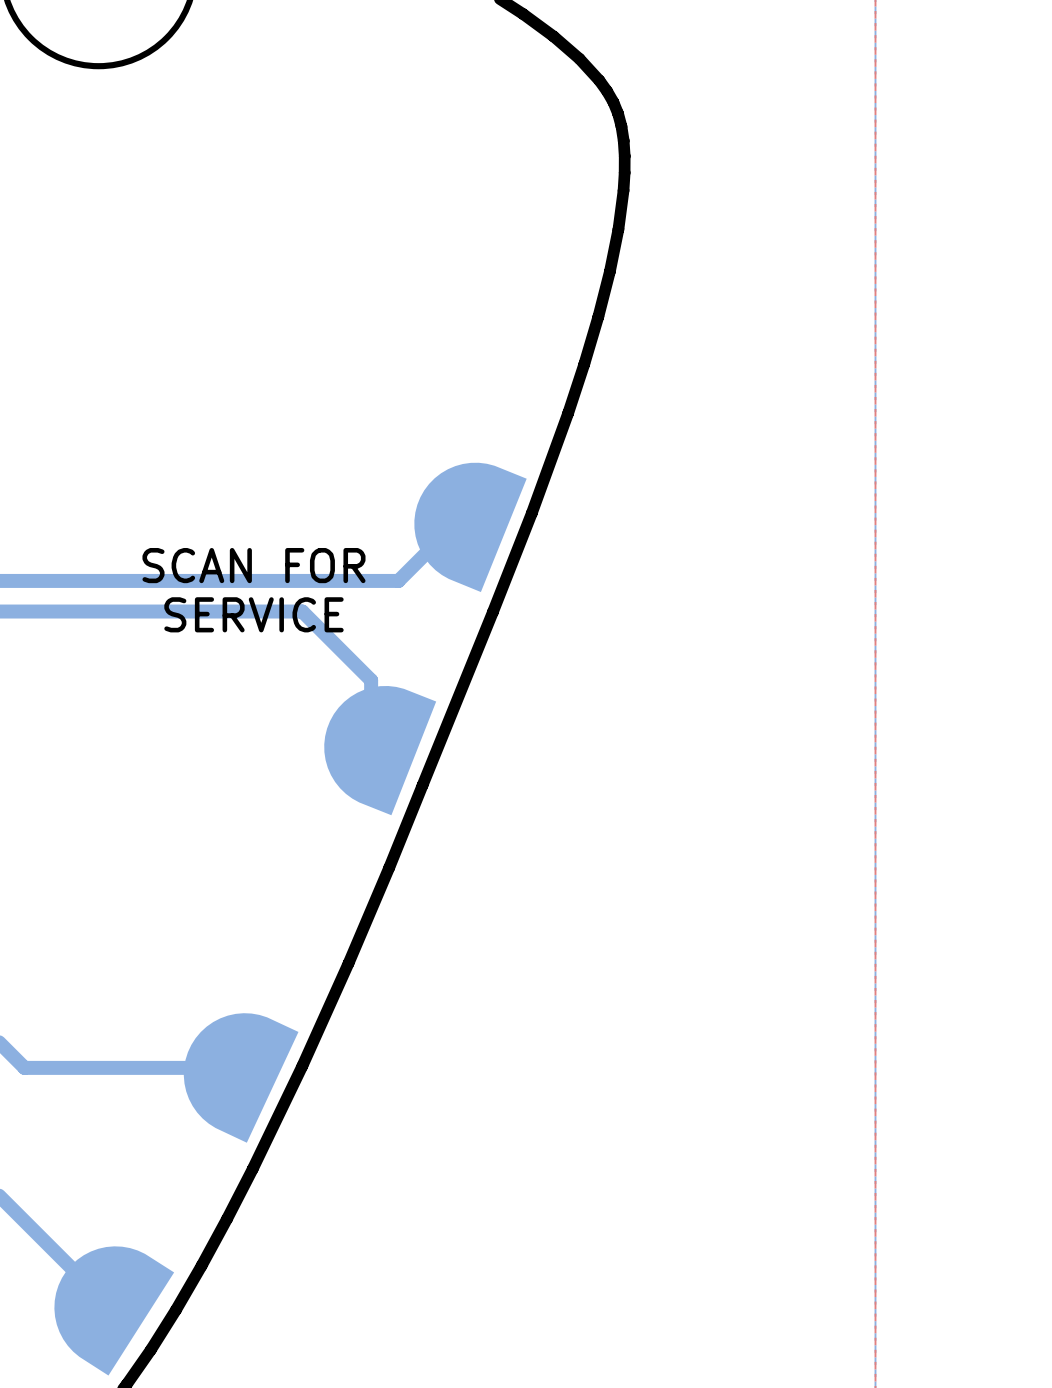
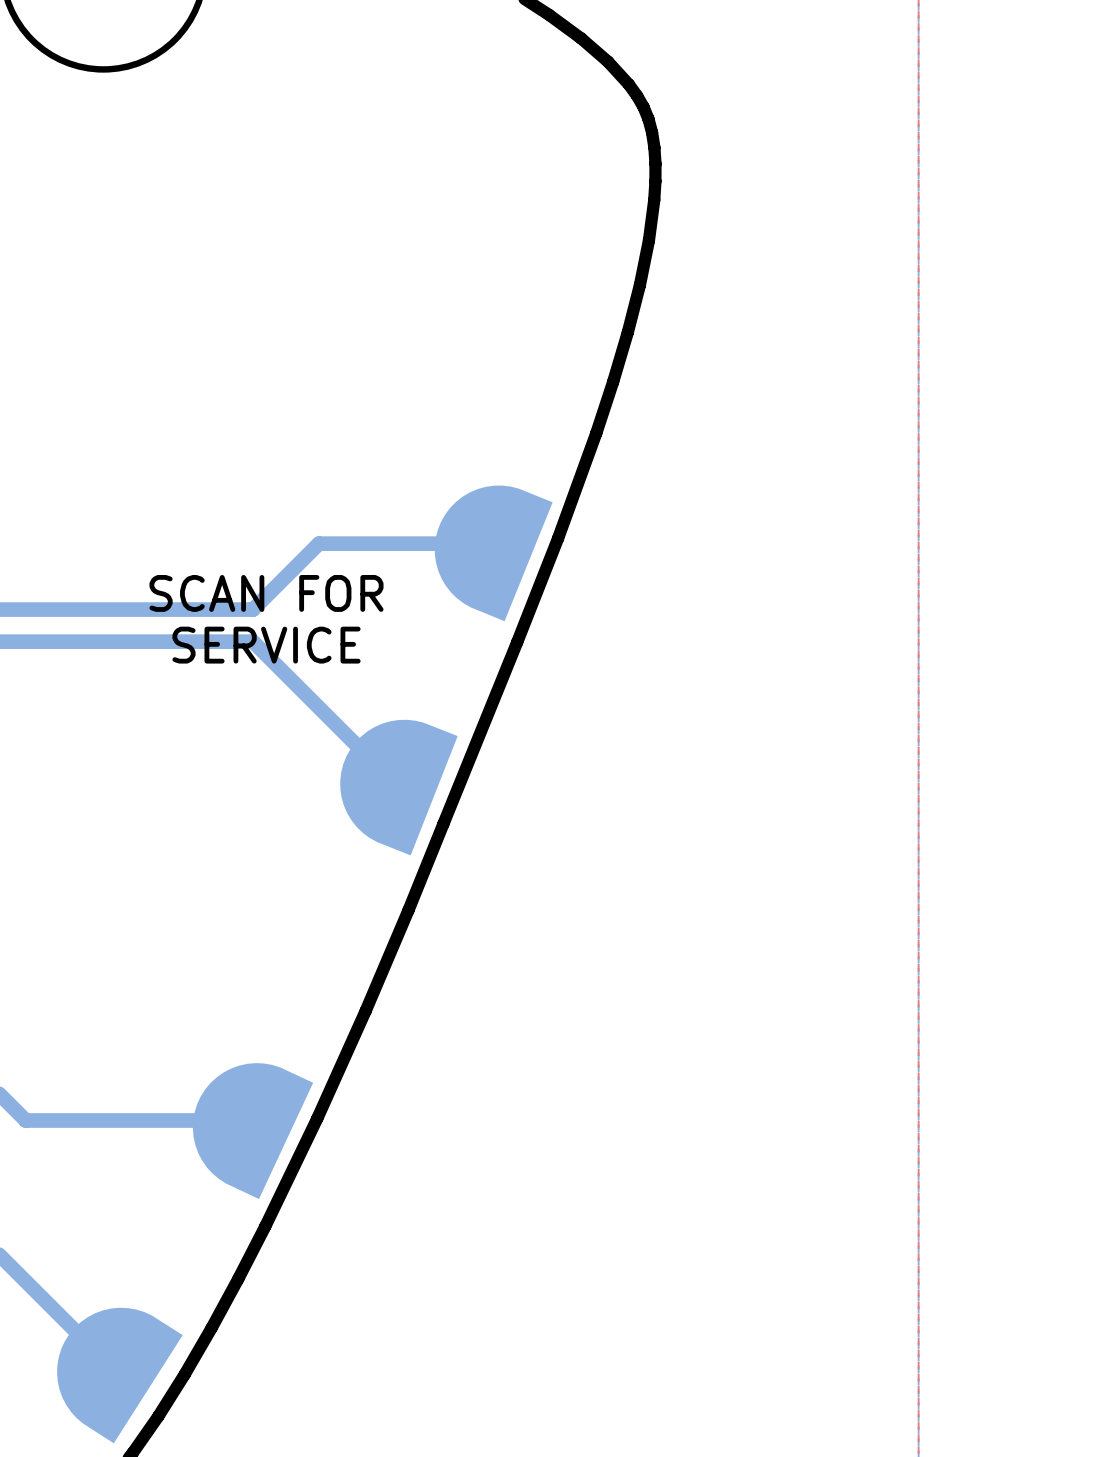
bottom track: (461, 518) (398, 580) (241, 580) -> (484, 543) (318, 543) (253, 609)
bottom track: (241, 611) (302, 611) (371, 680) (371, 741) -> (253, 641) (389, 778)

